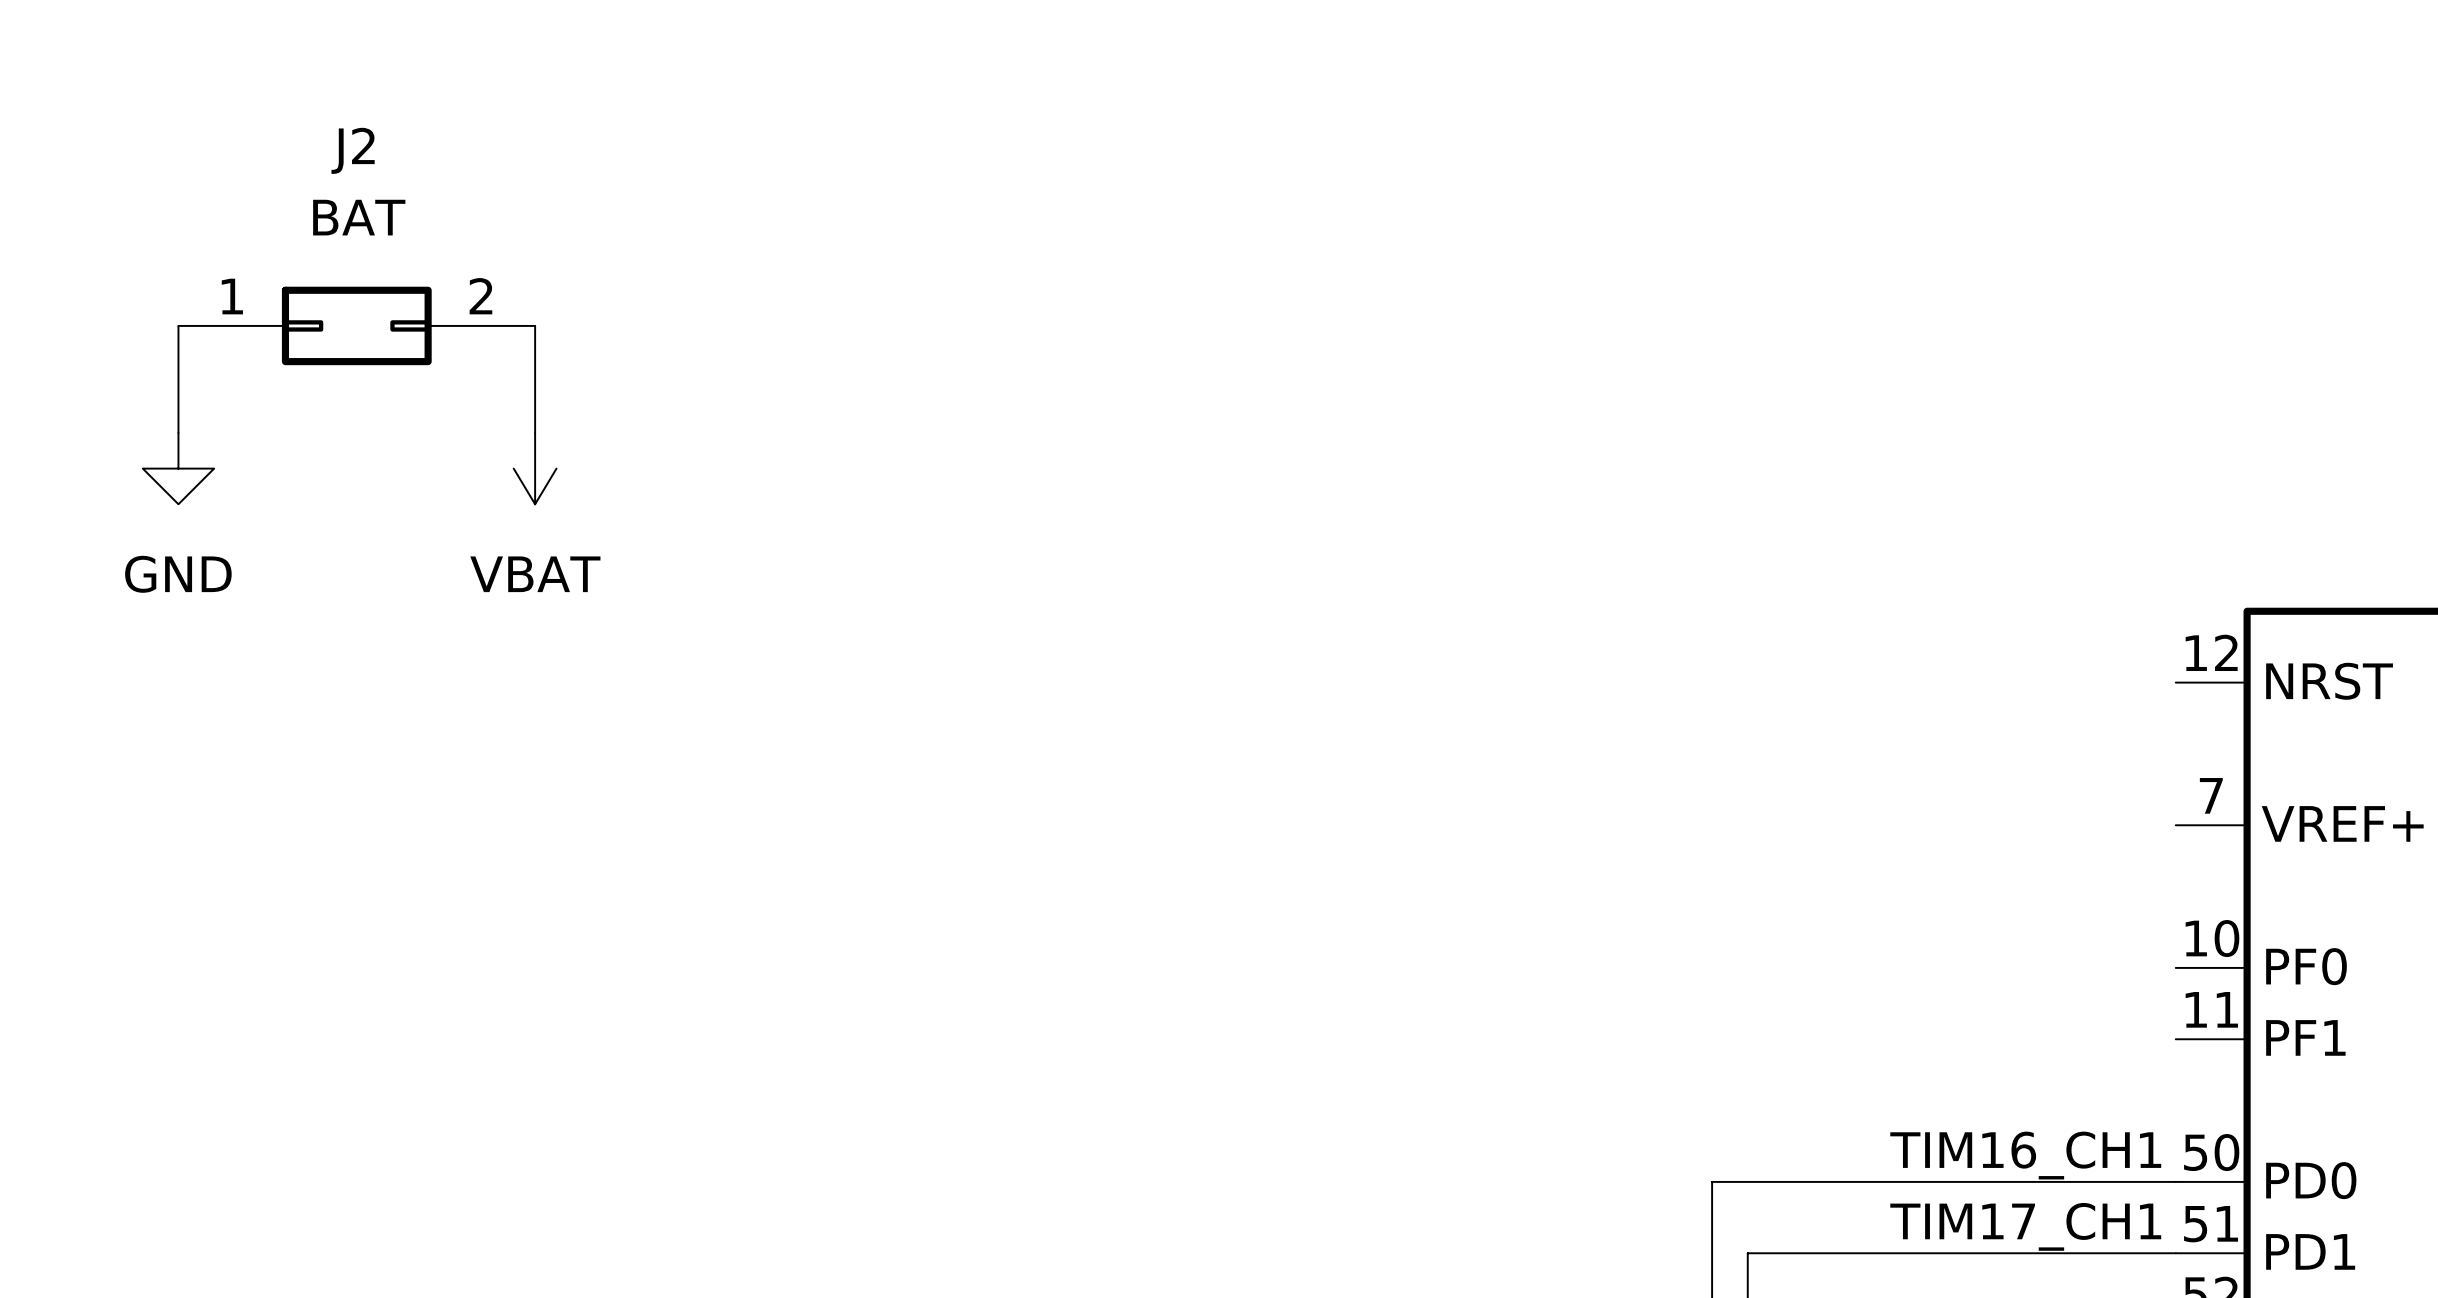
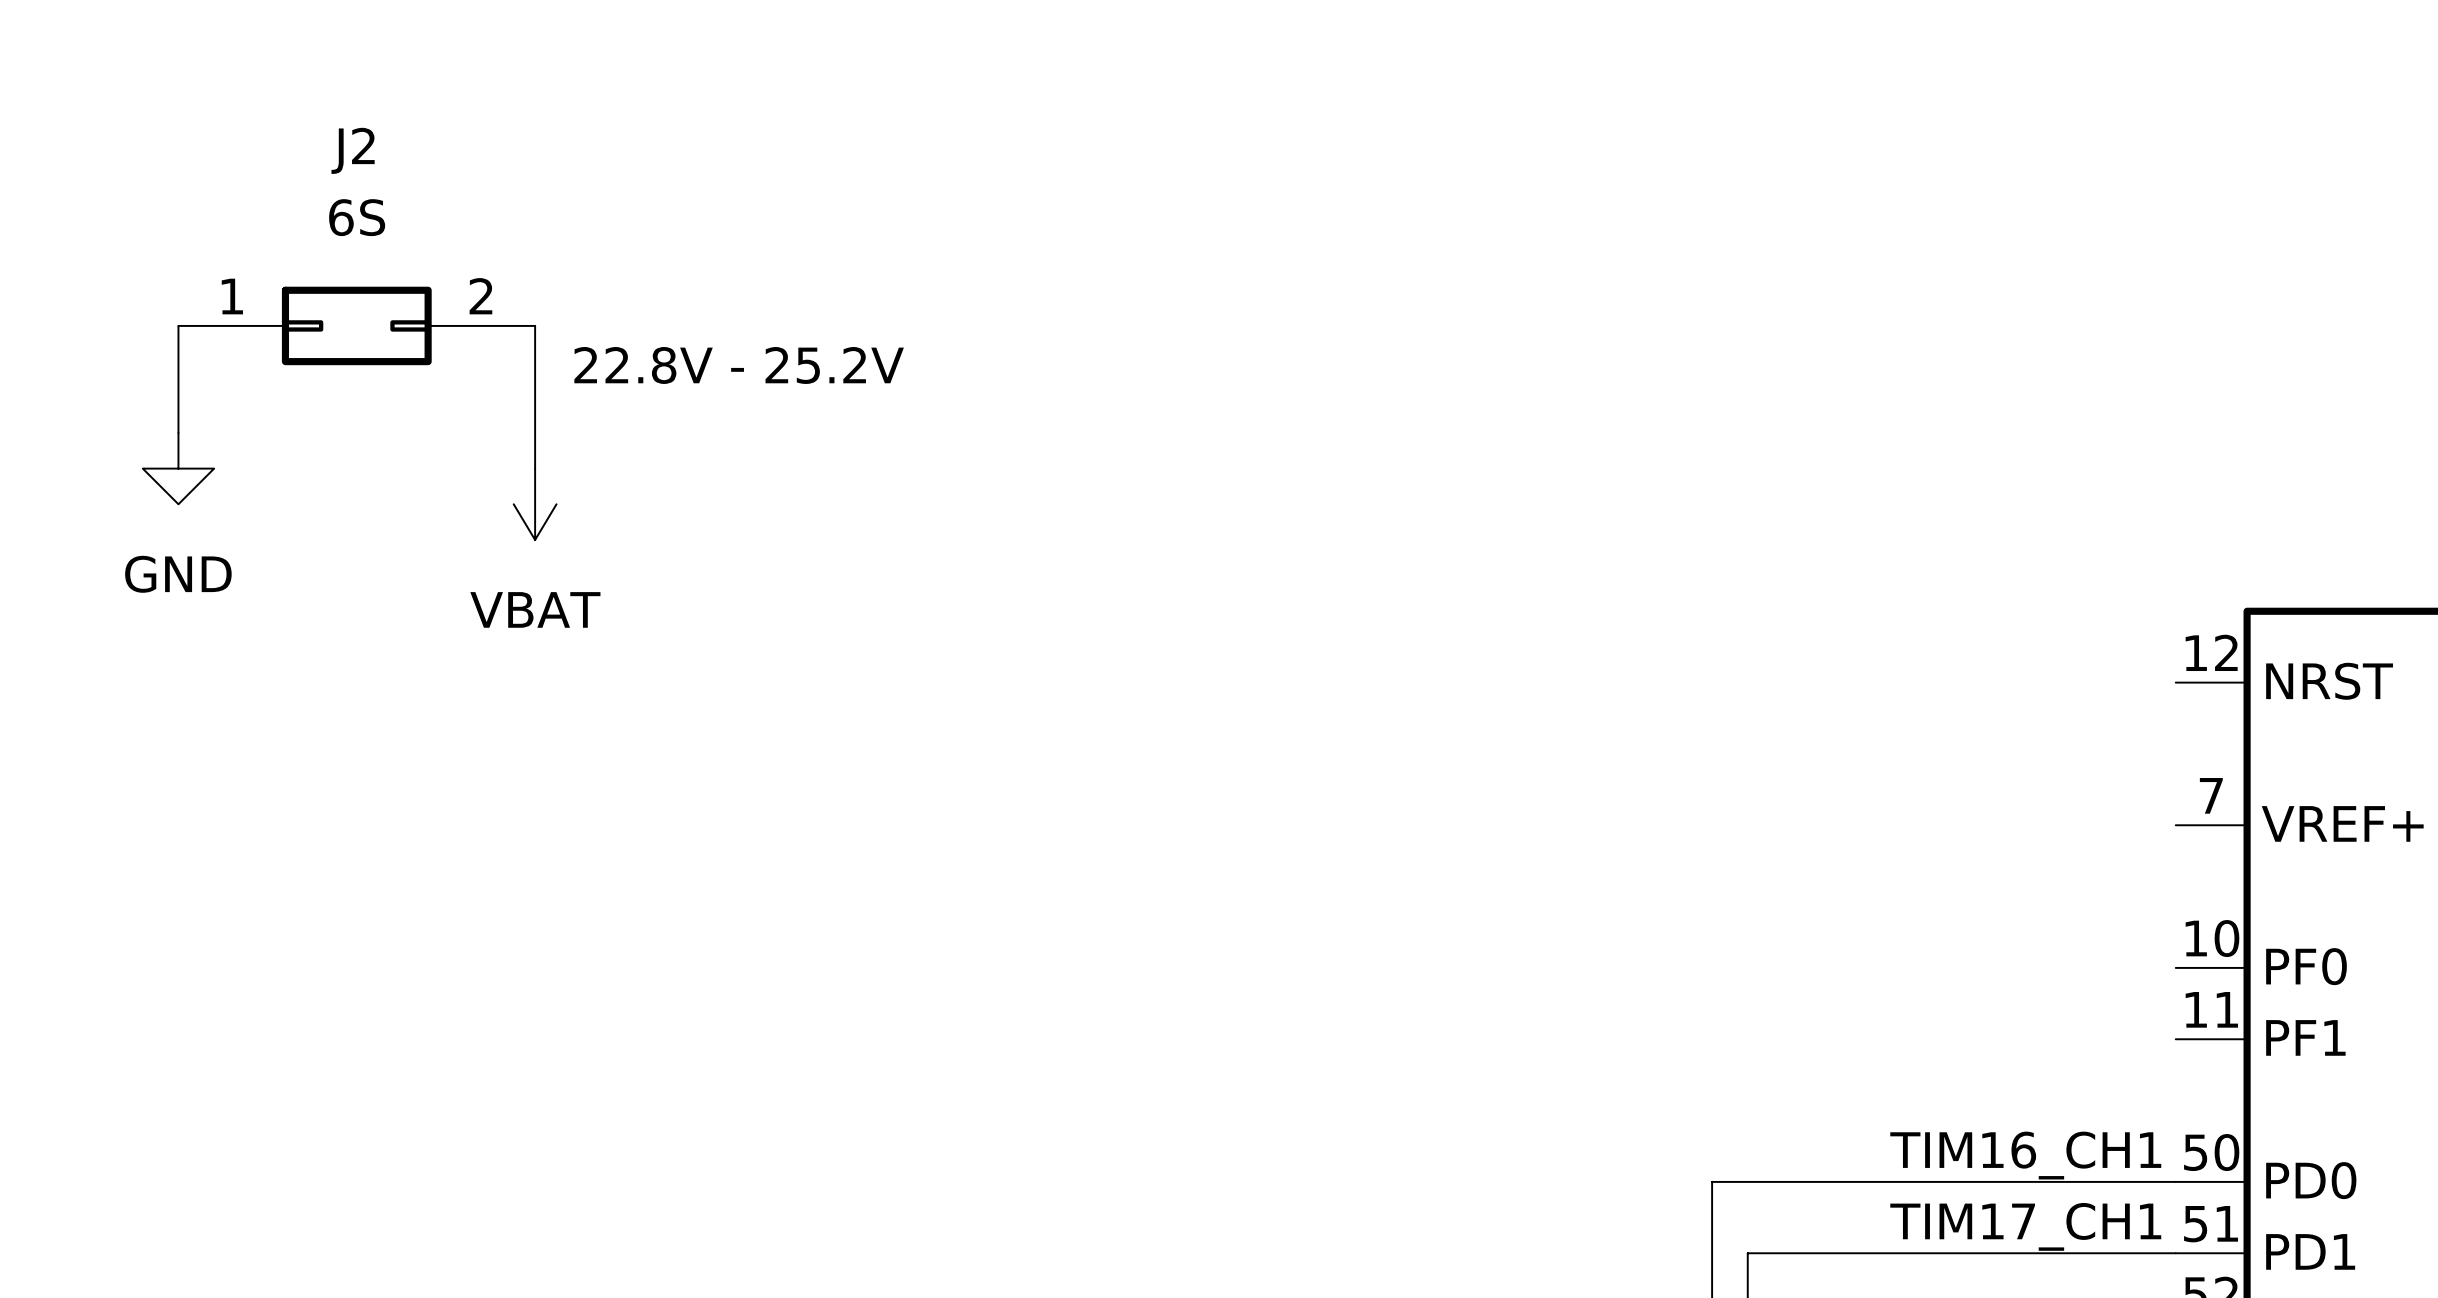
J2 value: BAT (359, 217) -> 6S (357, 217)
label: none -> 22.8V - 25.2V (739, 365)
power symbol position: VBAT (535, 468) -> VBAT (535, 504)

